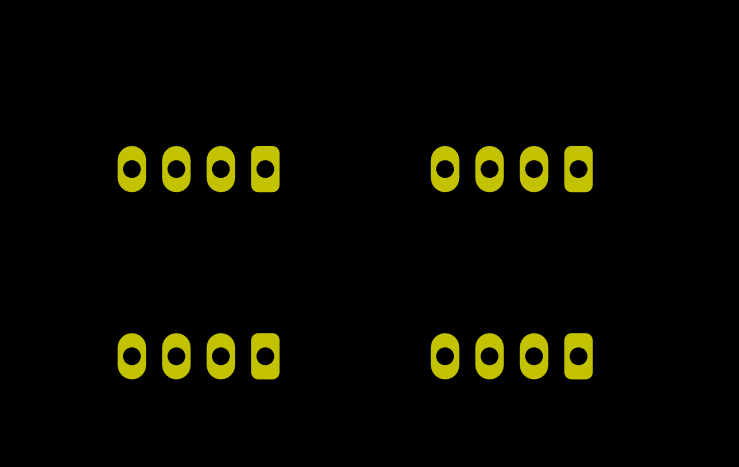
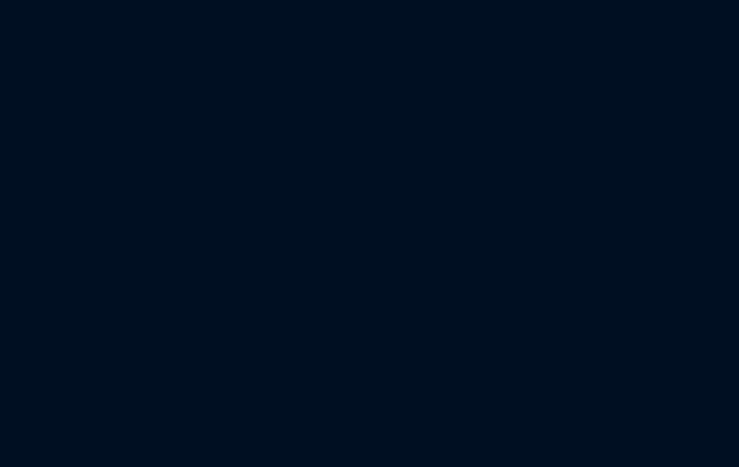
part: (198, 169) -> none
part: (511, 169) -> none
part: (198, 356) -> none
part: (511, 356) -> none

